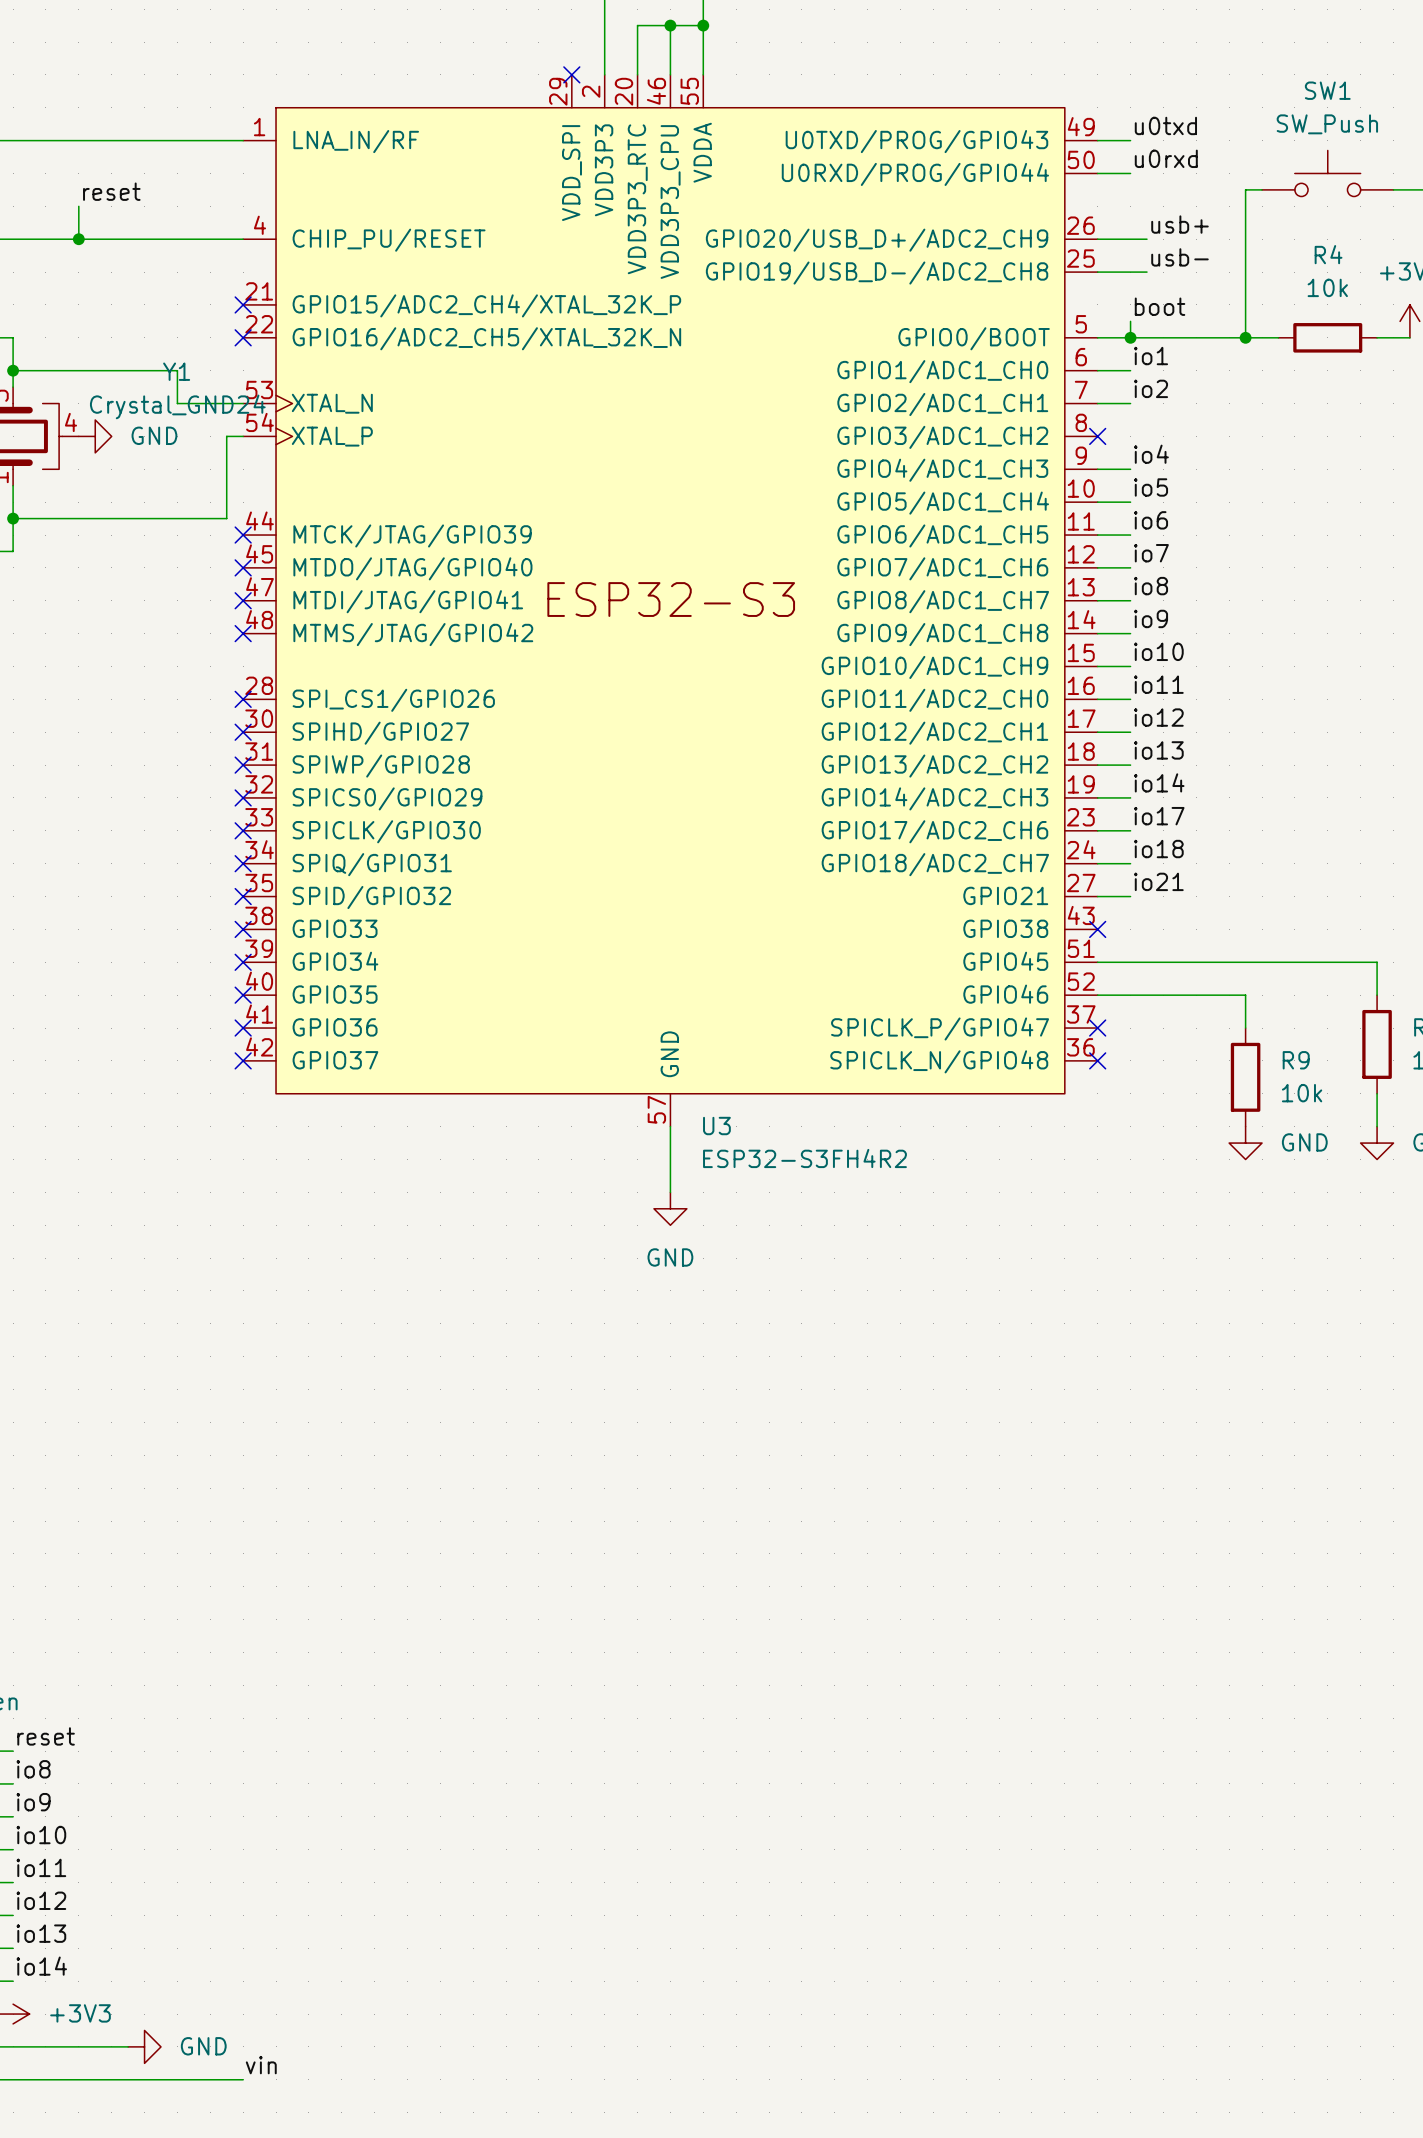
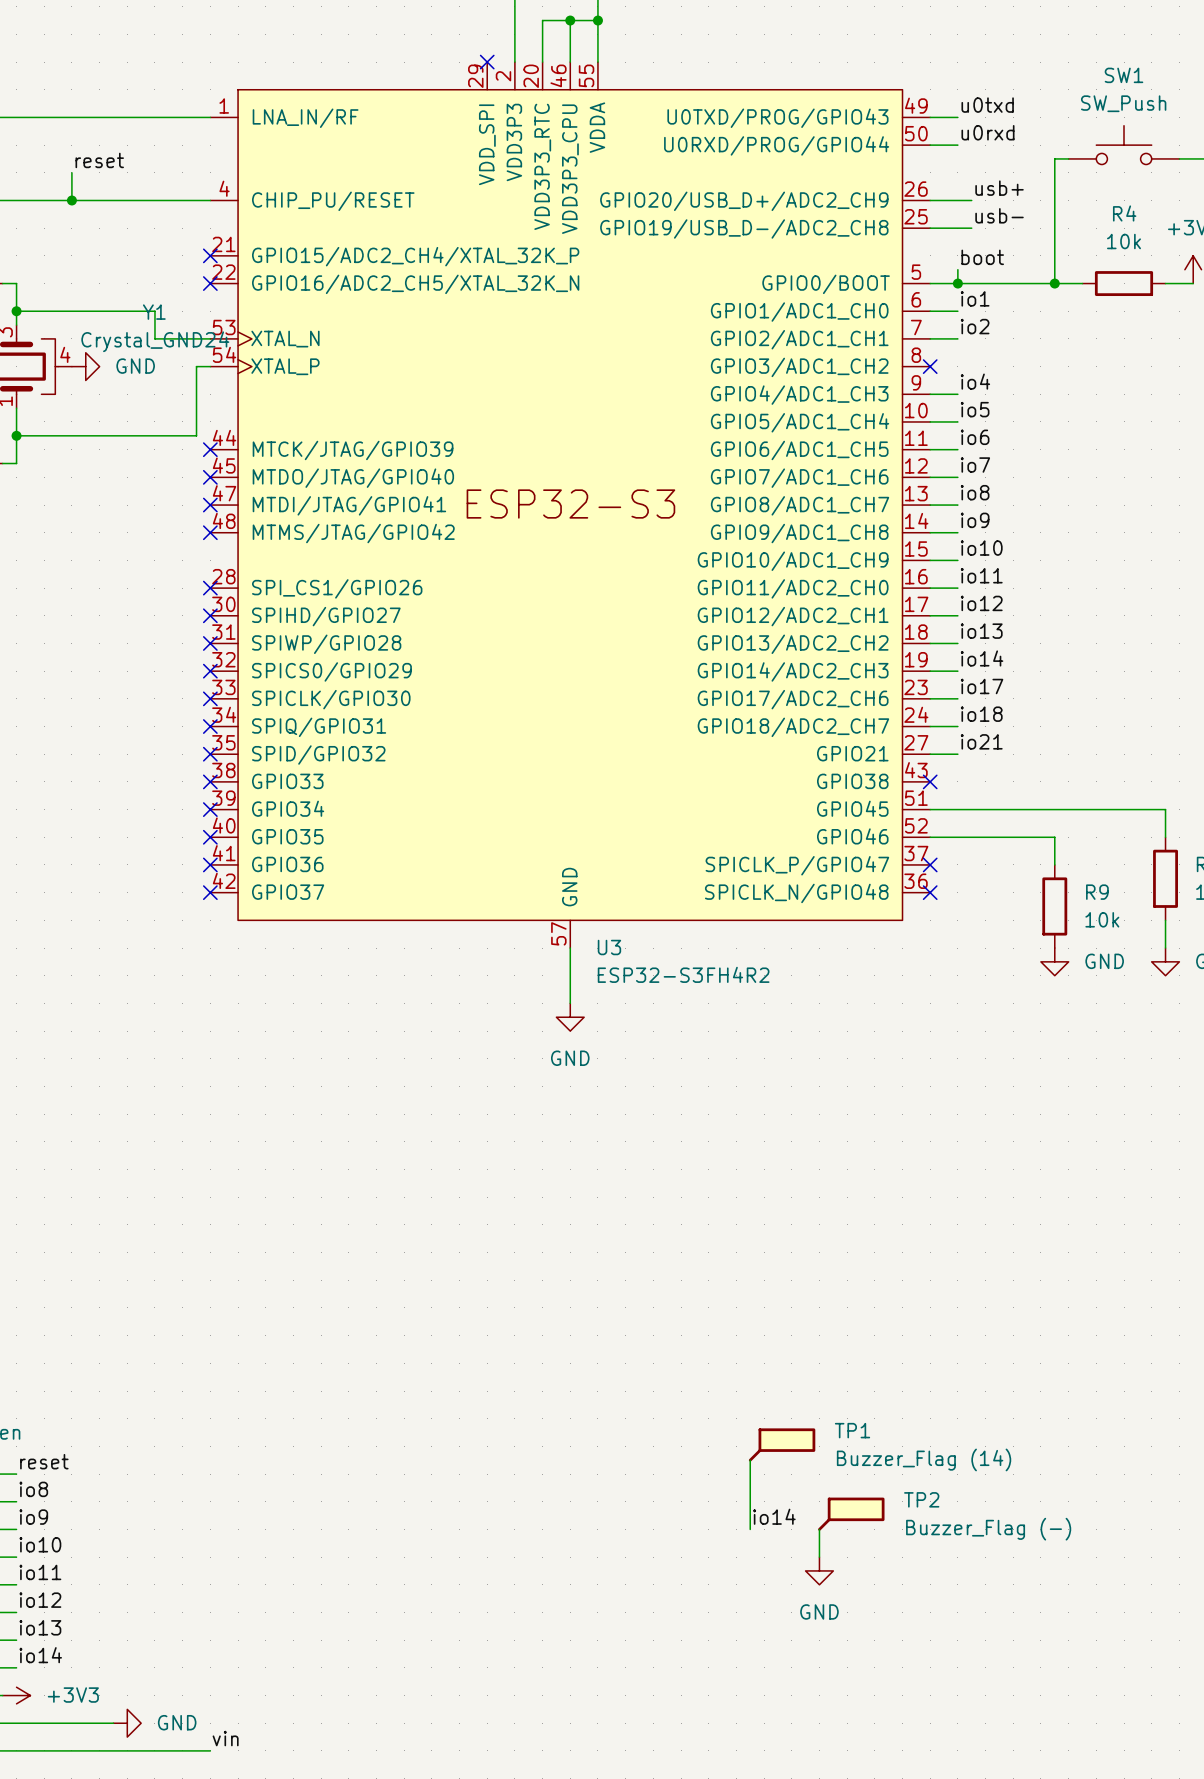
TP1: none -> Buzzer_Flag (14) (782, 1444)
wire: none -> (750, 1460) (750, 1529)
TP2: none -> Buzzer_Flag (-) (851, 1514)
label: none -> io14 (774, 1516)
wire: none -> (819, 1529) (819, 1557)
power symbol: none -> GND (819, 1570)

